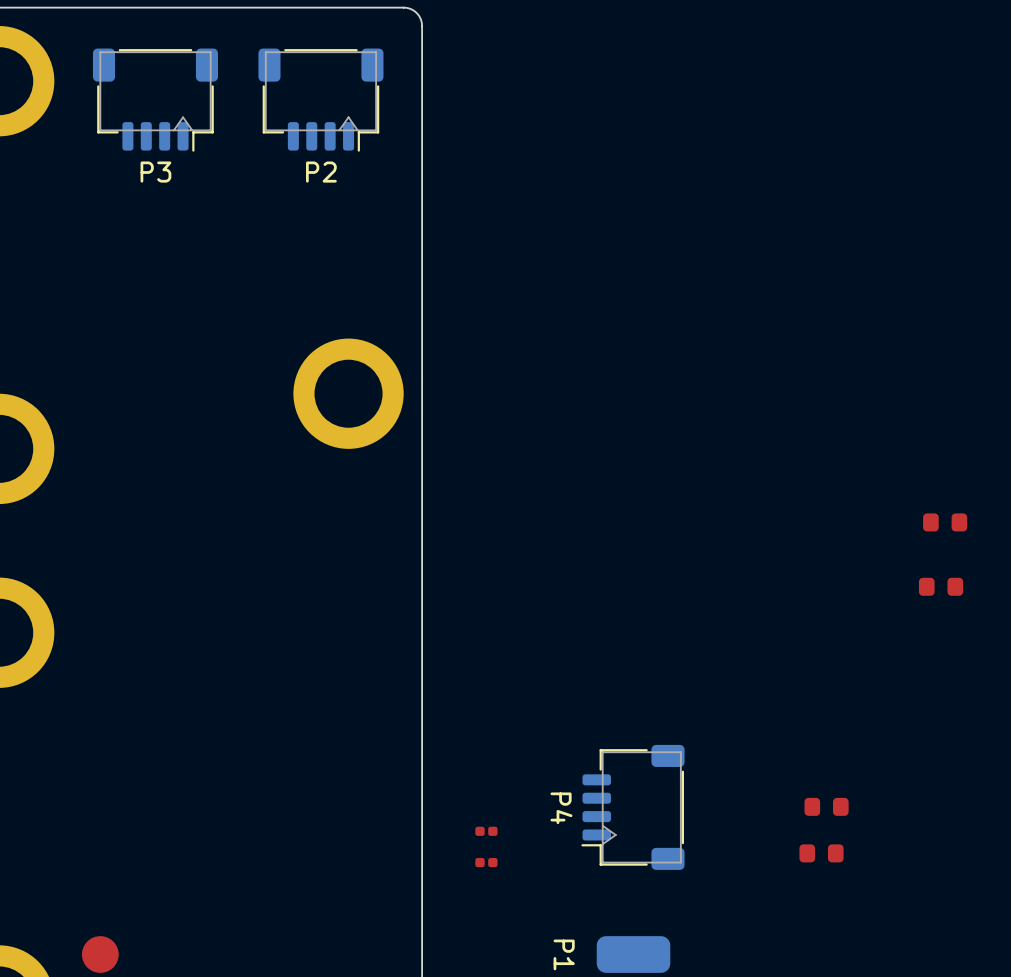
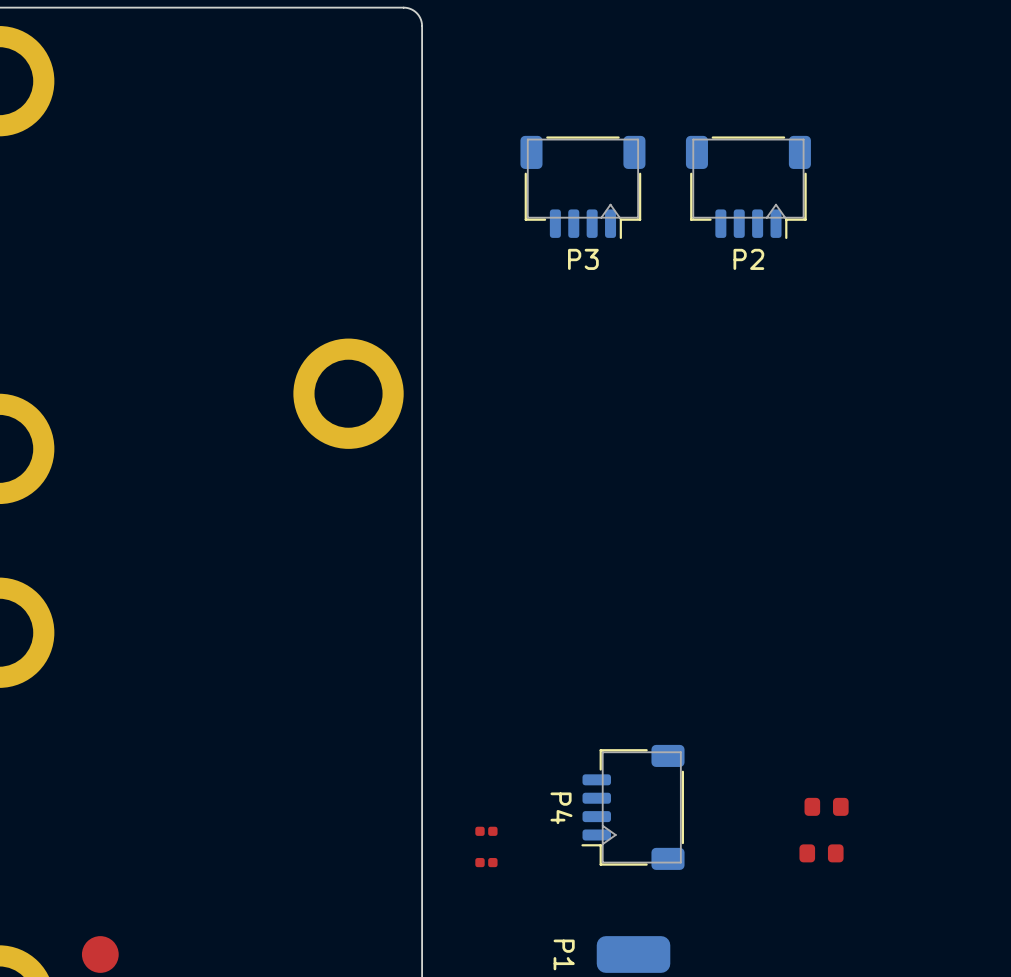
P3 position: (155, 100) -> (582, 187)
P2 position: (320, 100) -> (748, 187)
part: (945, 522) -> none
part: (941, 586) -> none

